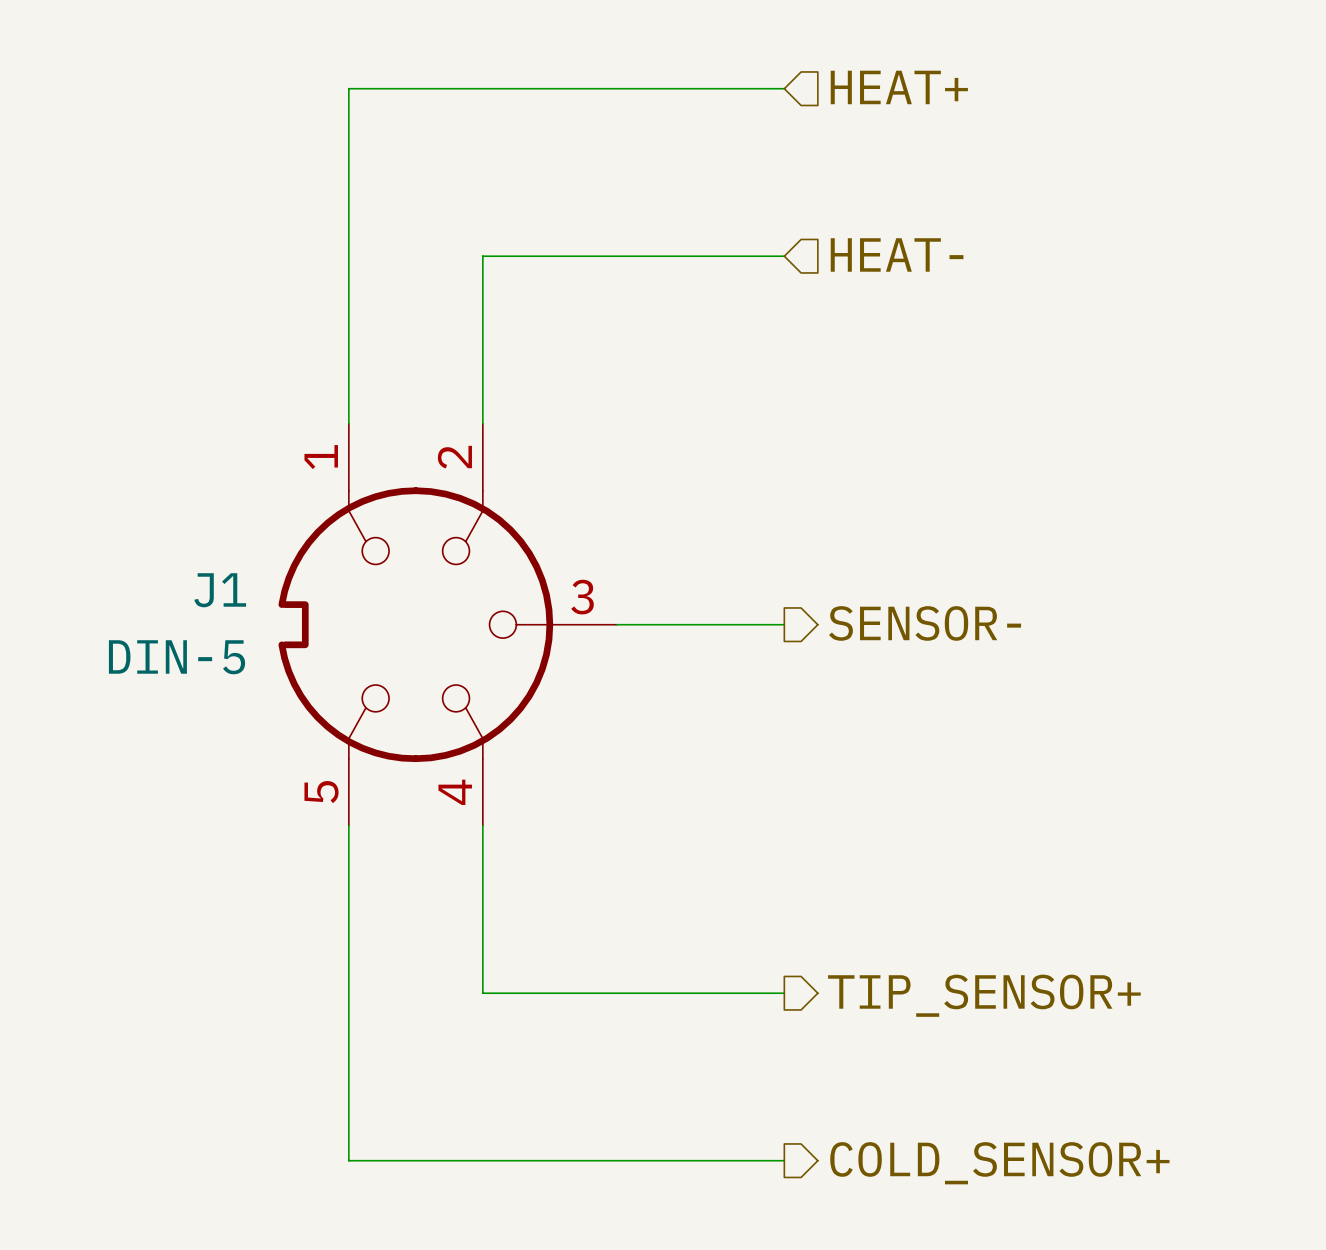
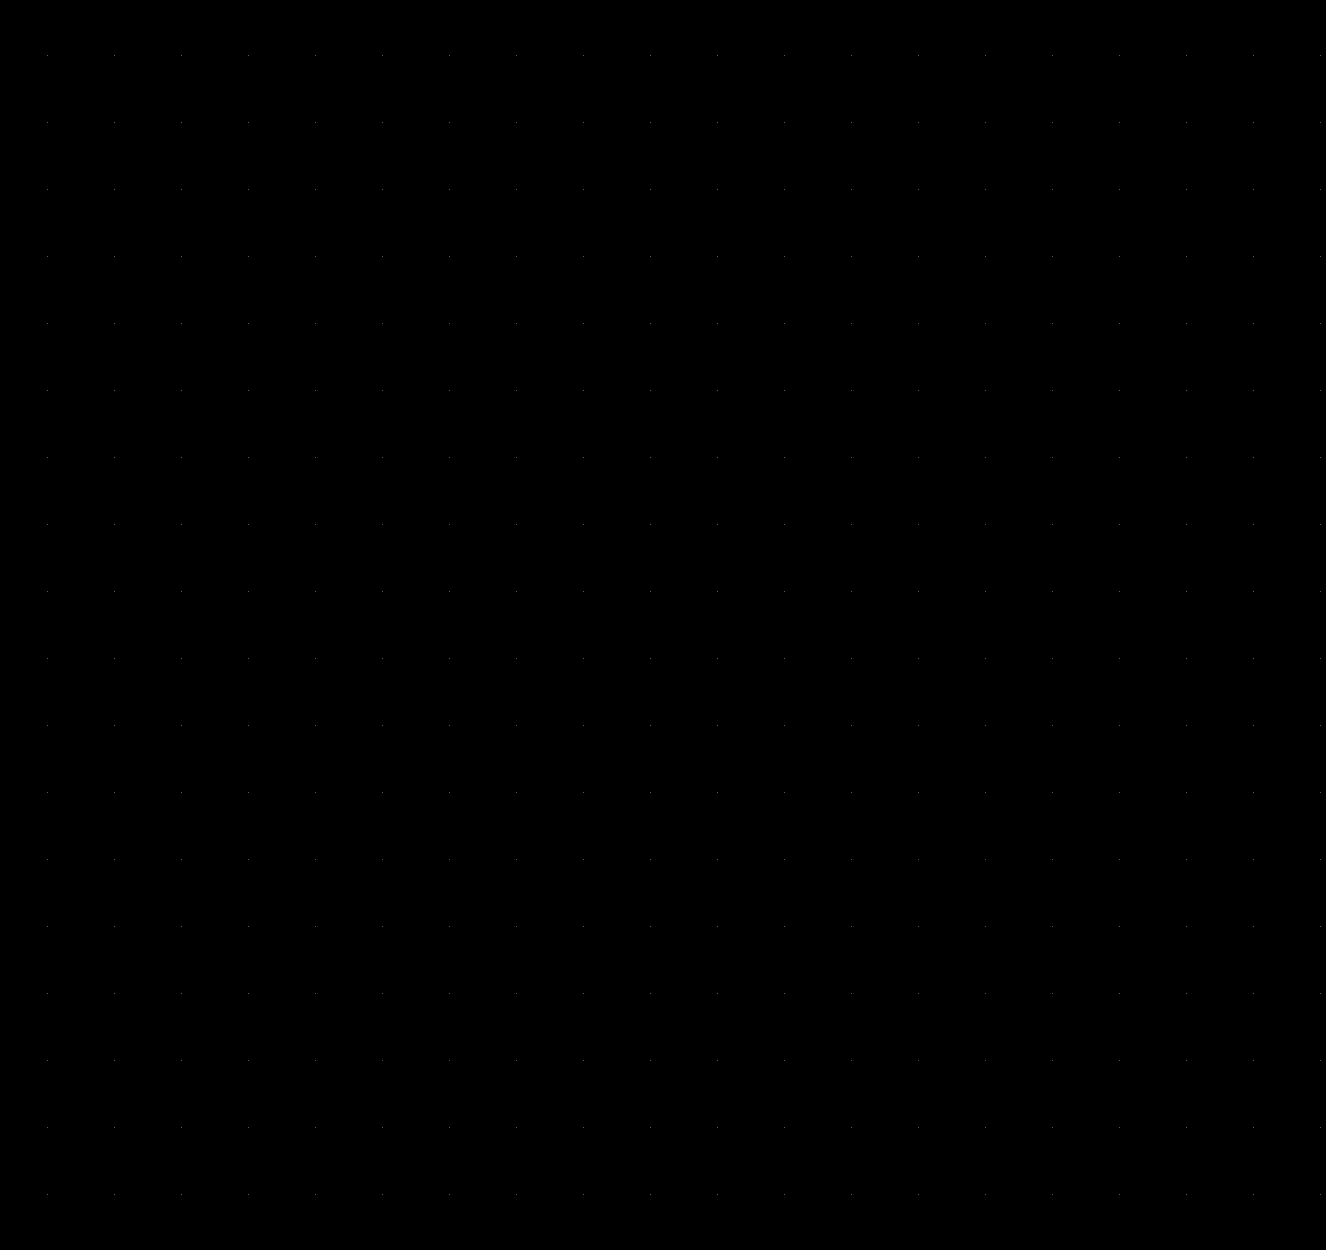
hierarchical label: HEAT+ (899, 87) -> none
wire: (784, 88) (348, 88) (348, 423) -> none
hierarchical label: HEAT- (897, 254) -> none
wire: (784, 256) (482, 256) (482, 423) -> none
hierarchical label: SENSOR- (925, 623) -> none
J1: DIN-5 (447, 624) -> none
wire: (616, 624) (784, 624) -> none
wire: (348, 825) (348, 1160) (784, 1160) -> none
wire: (482, 825) (482, 993) (784, 993) -> none
hierarchical label: TIP_SENSOR+ (984, 995) -> none
hierarchical label: COLD_SENSOR+ (999, 1163) -> none

